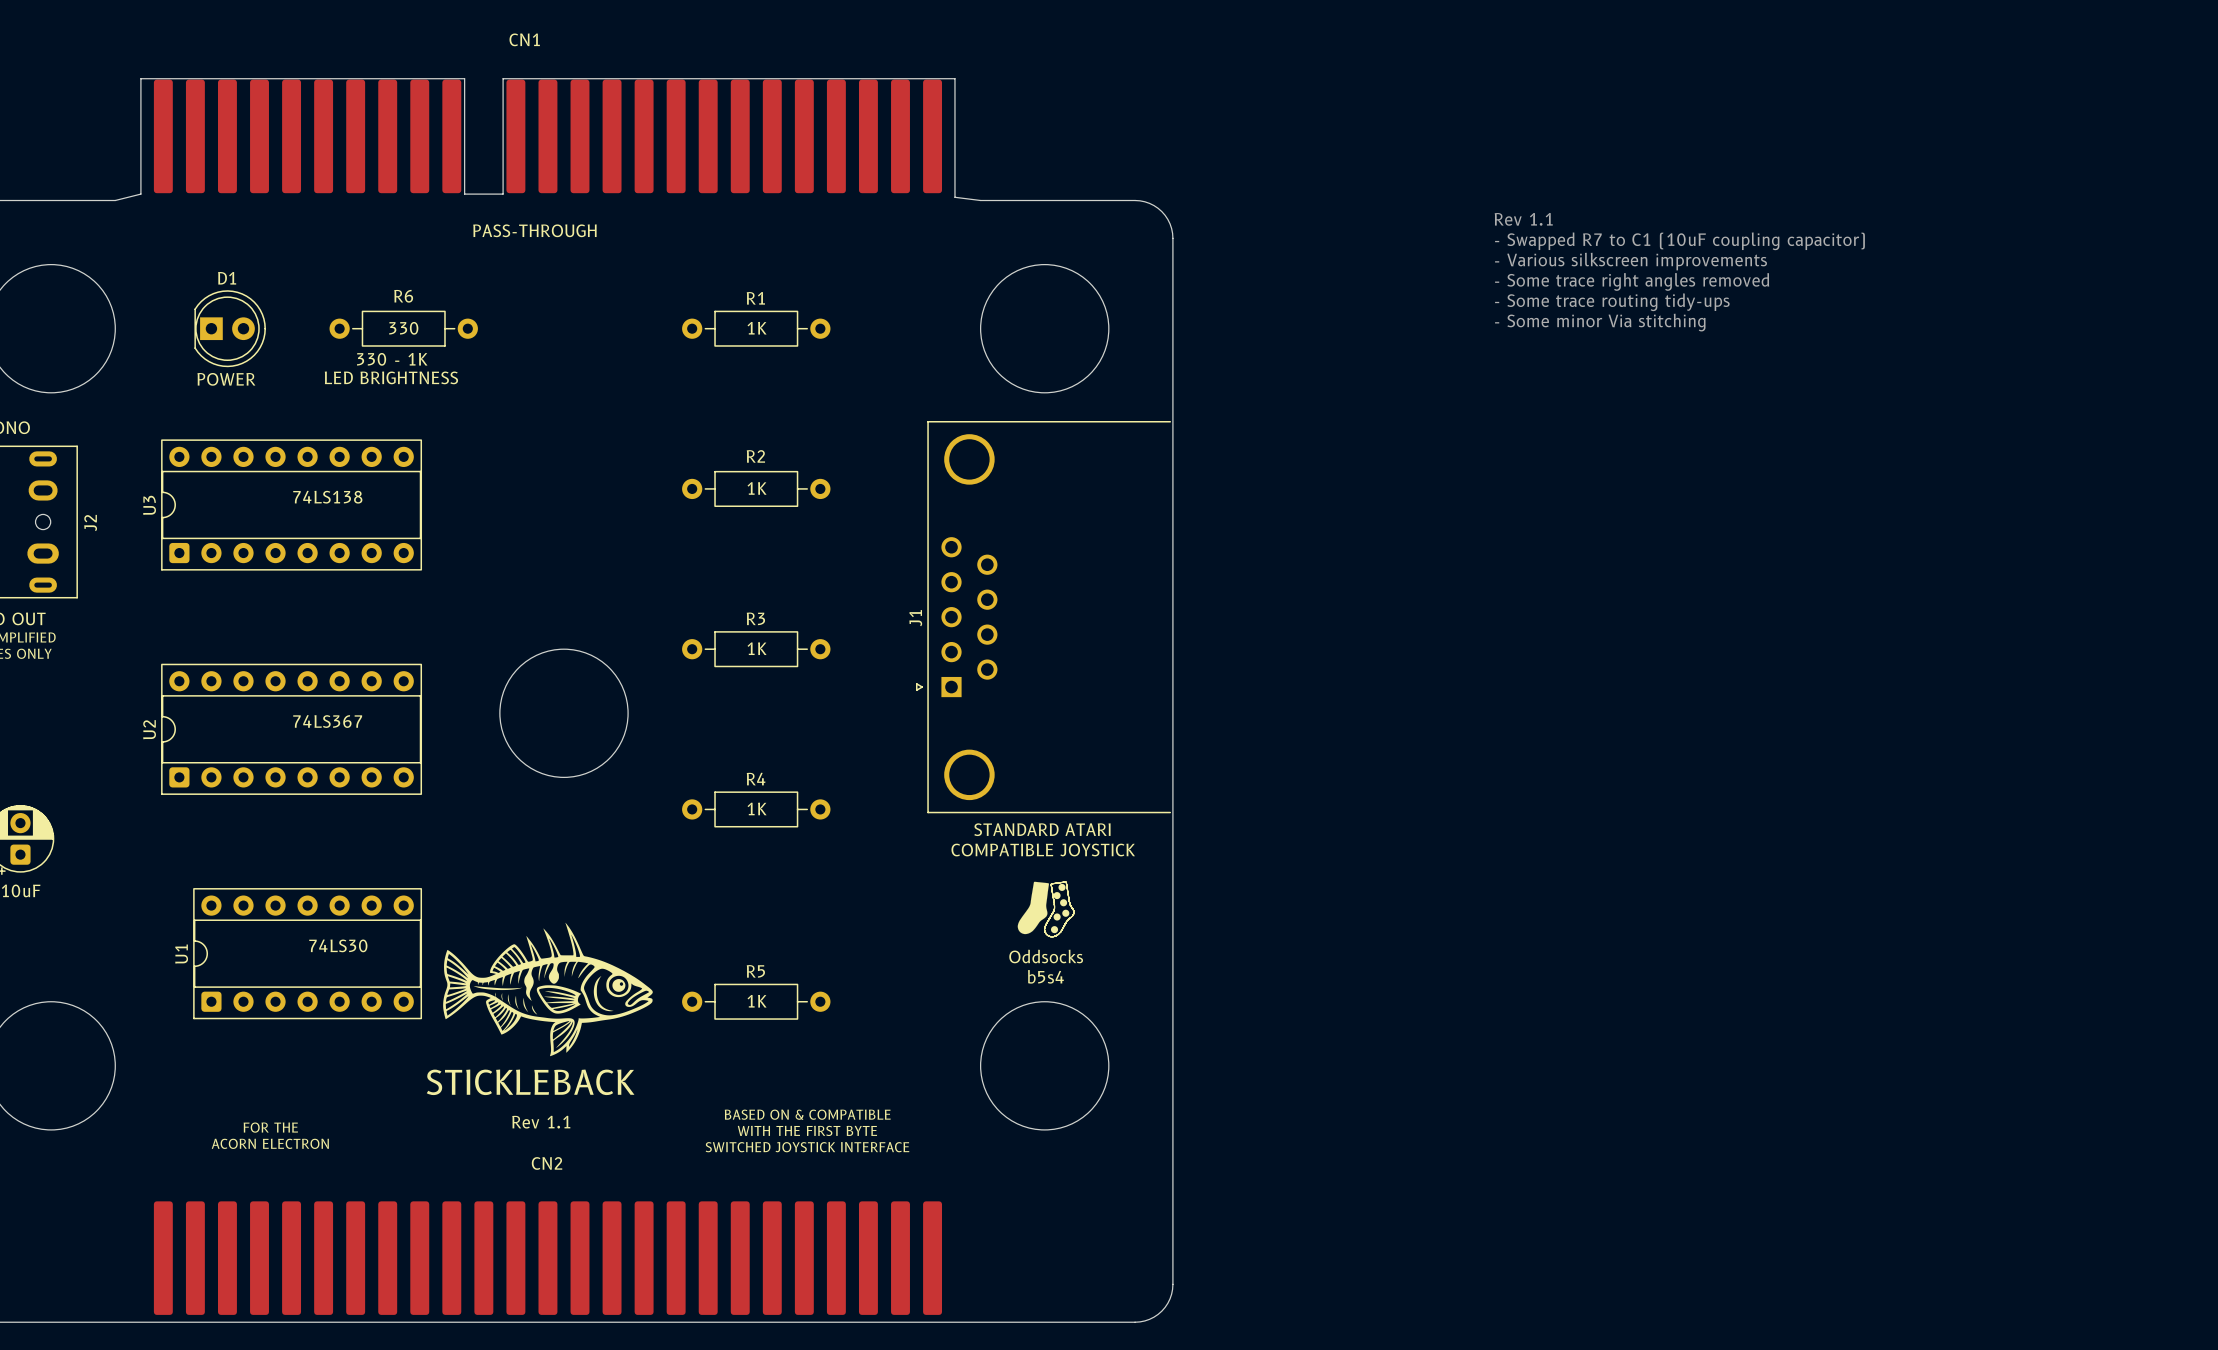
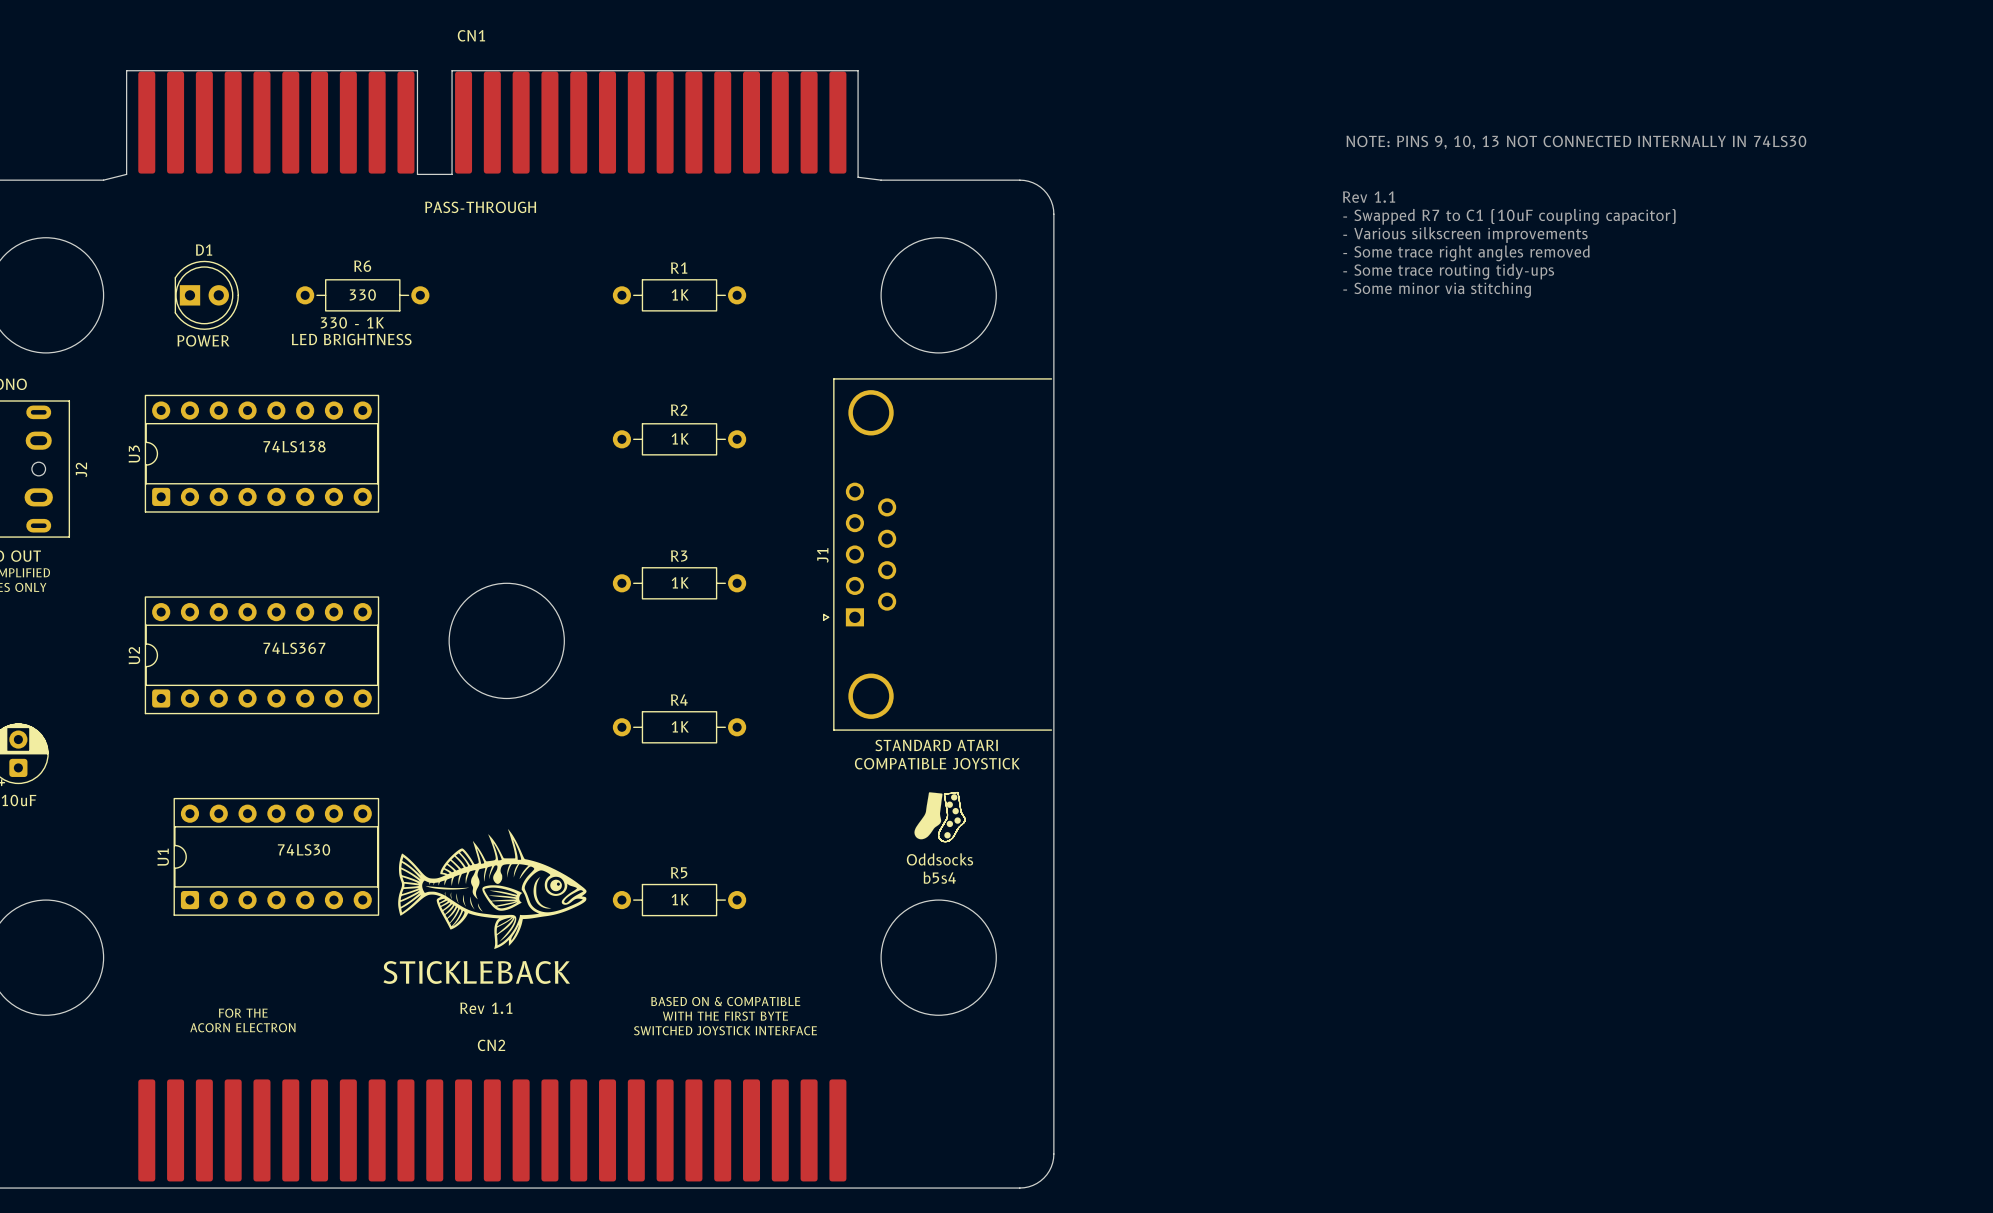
text: none -> NOTE: PINS 9, 10, 13 NOT CONNECTED INTERNALLY IN 74LS30 (1576, 142)
text: - Some minor Via stitching (1600, 322) -> - Some minor via stitching (1437, 289)

